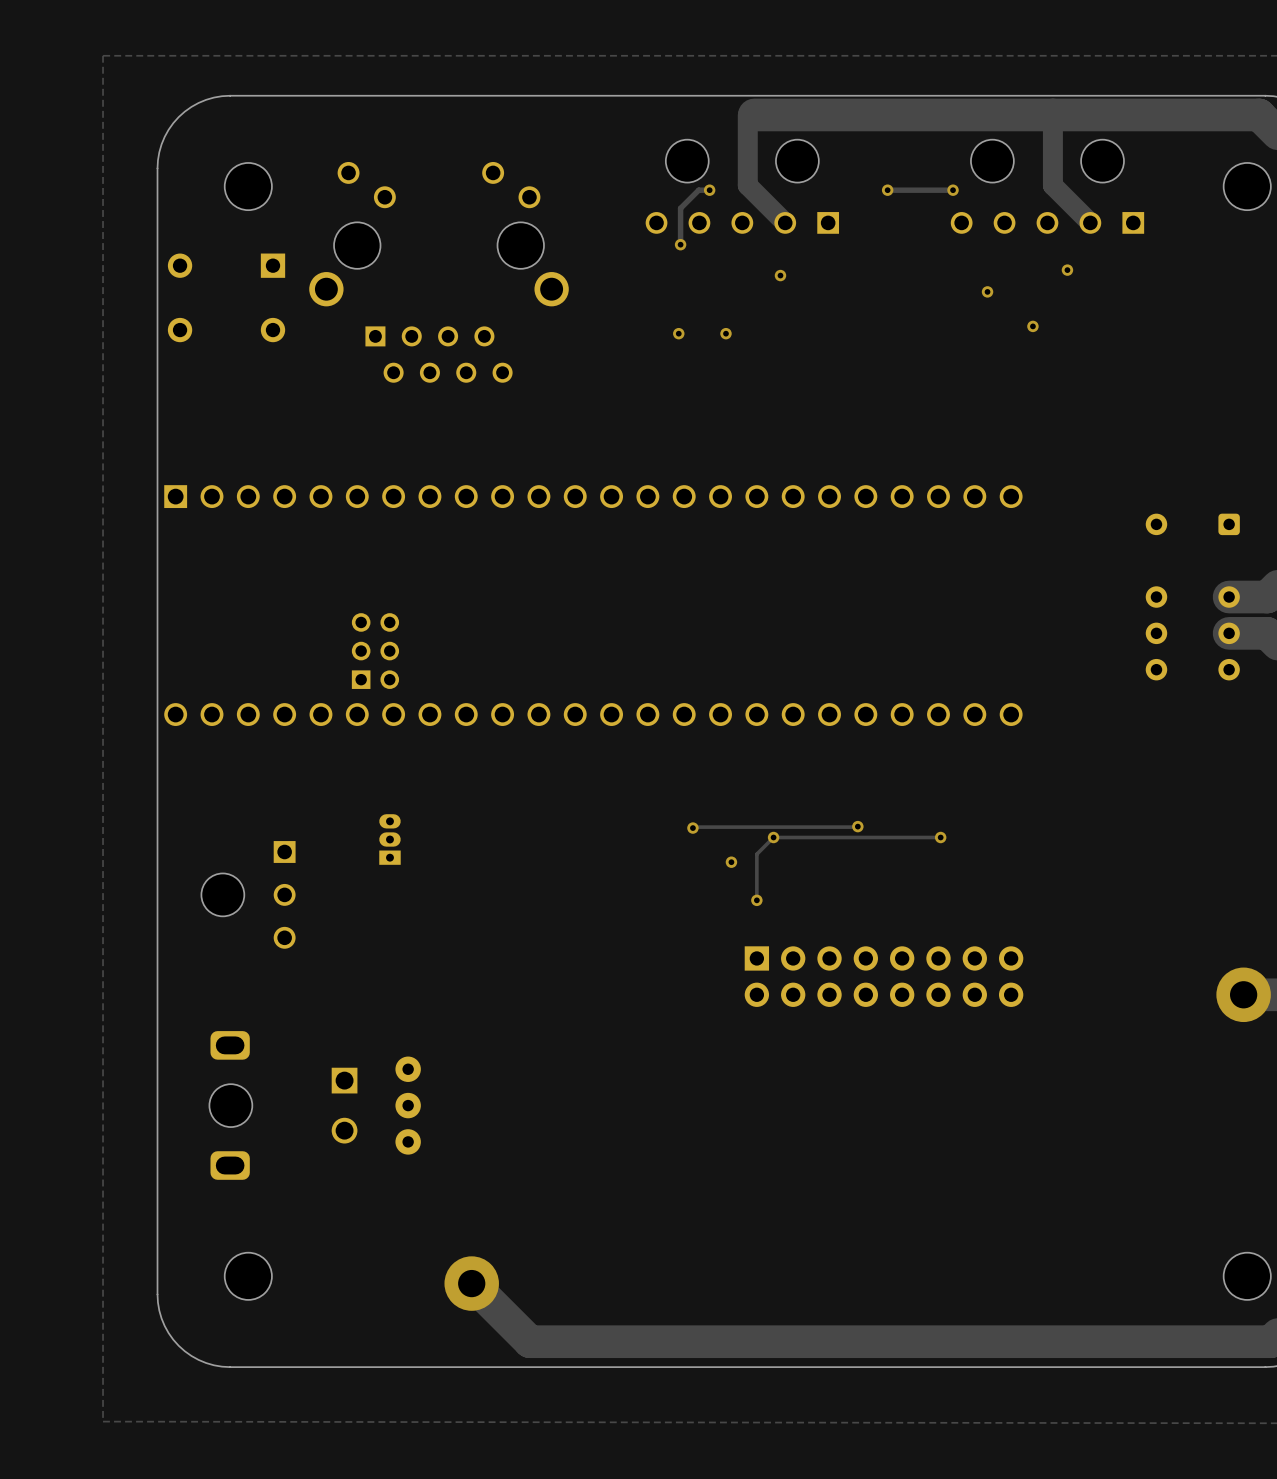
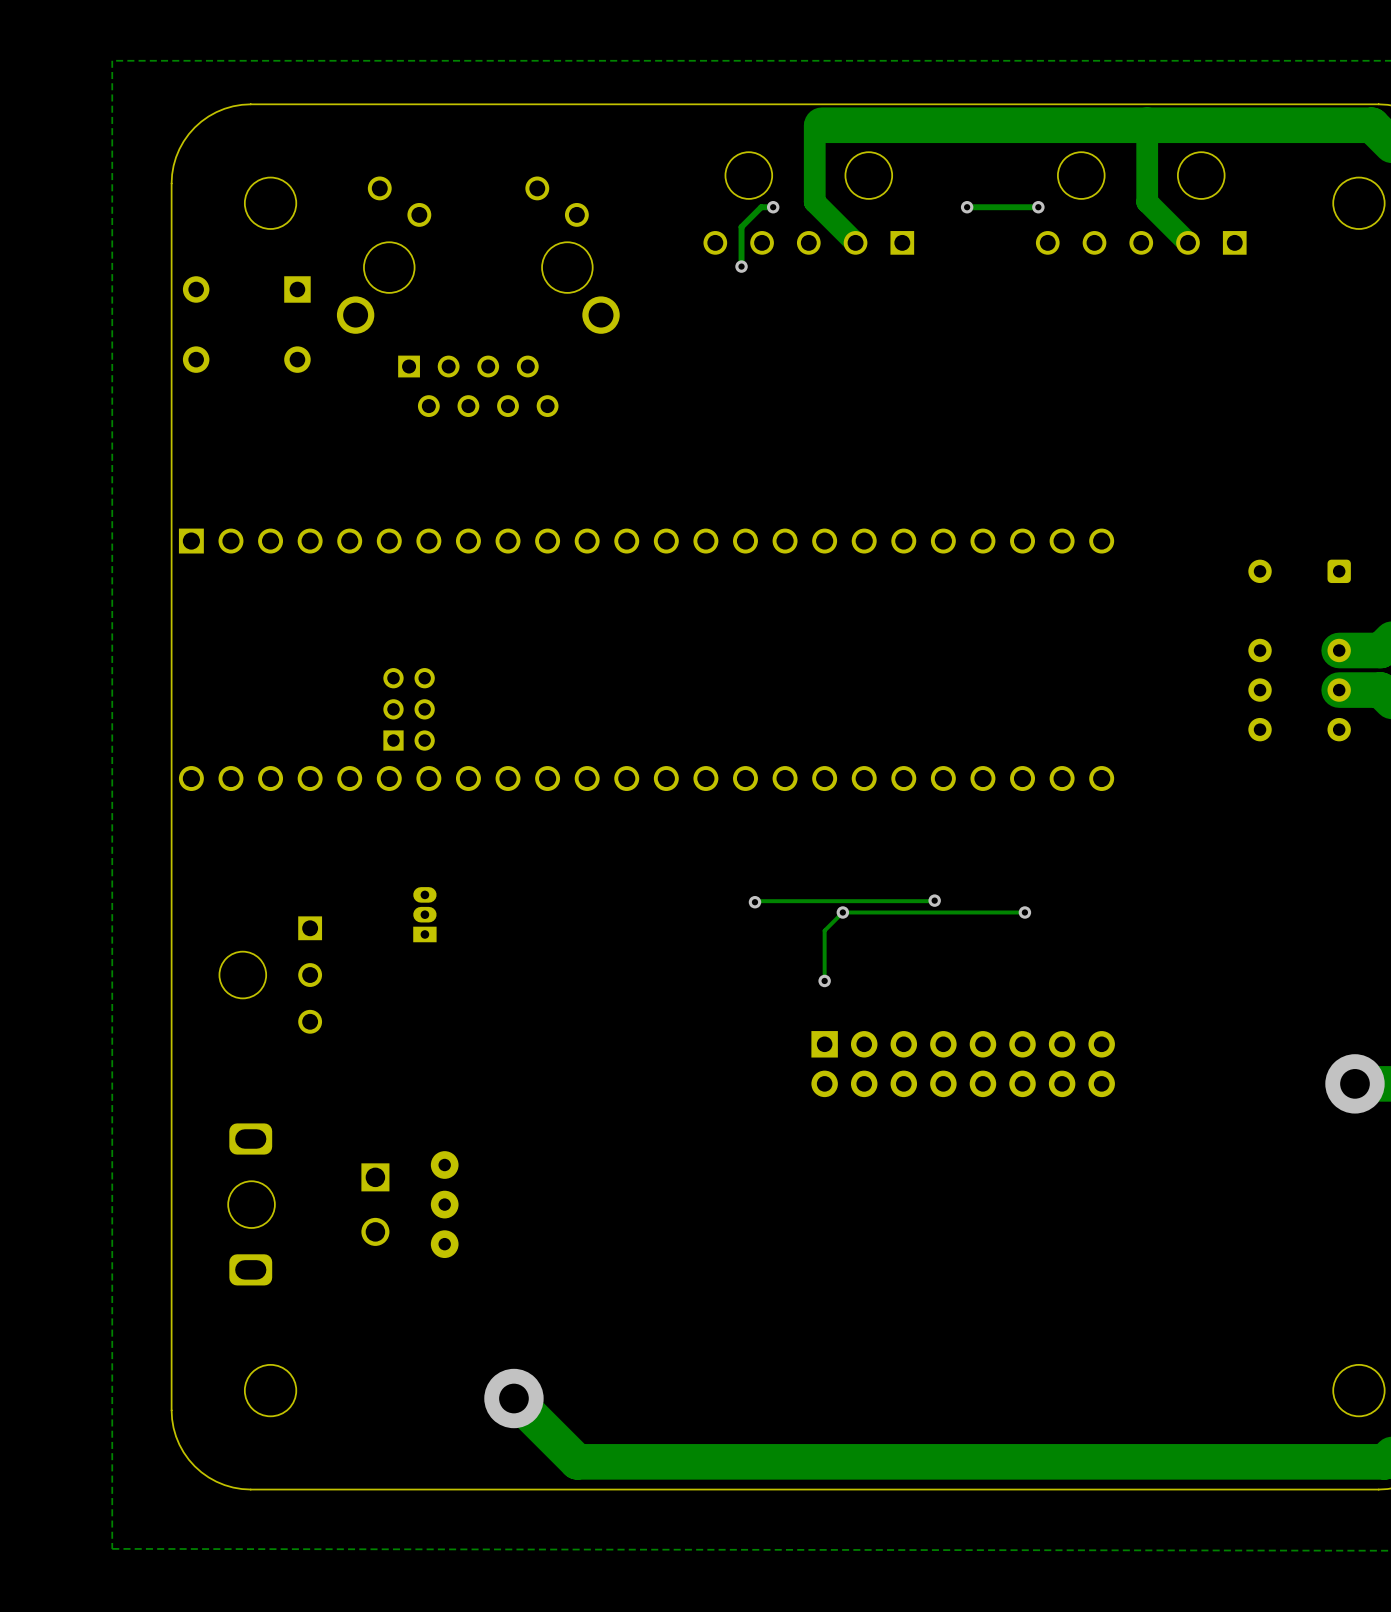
via: (1067, 270) -> none
via: (780, 275) -> none
via: (987, 291) -> none
via: (1032, 326) -> none
via: (678, 333) -> none
via: (725, 333) -> none
via: (731, 862) -> none

